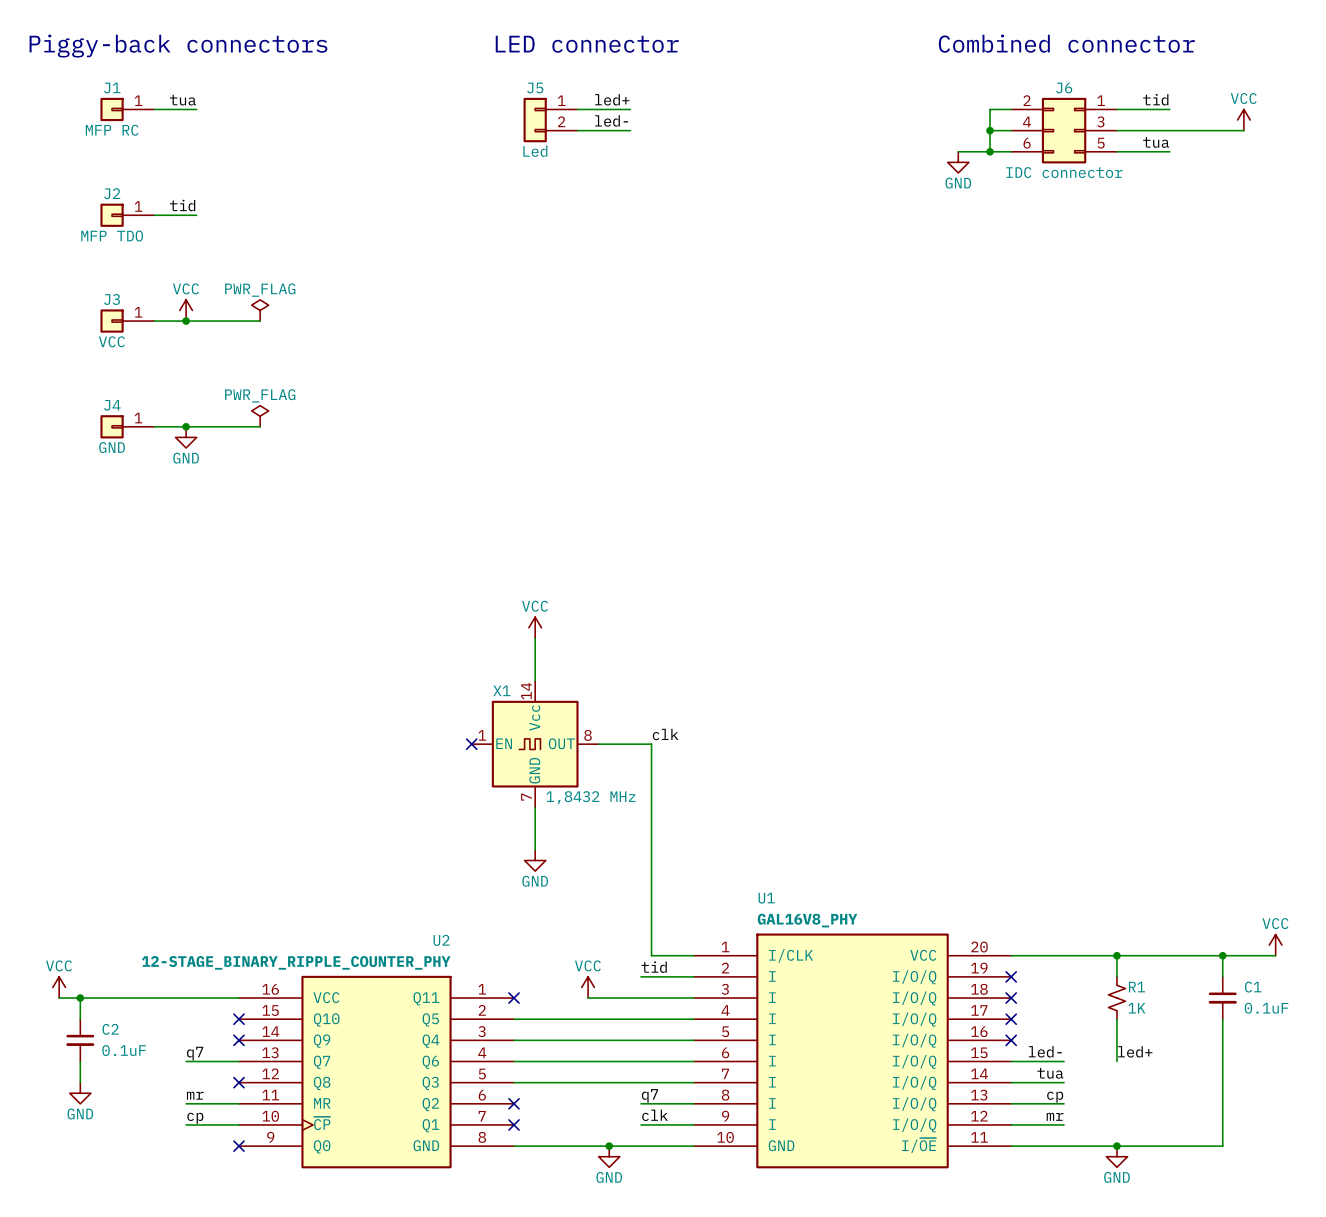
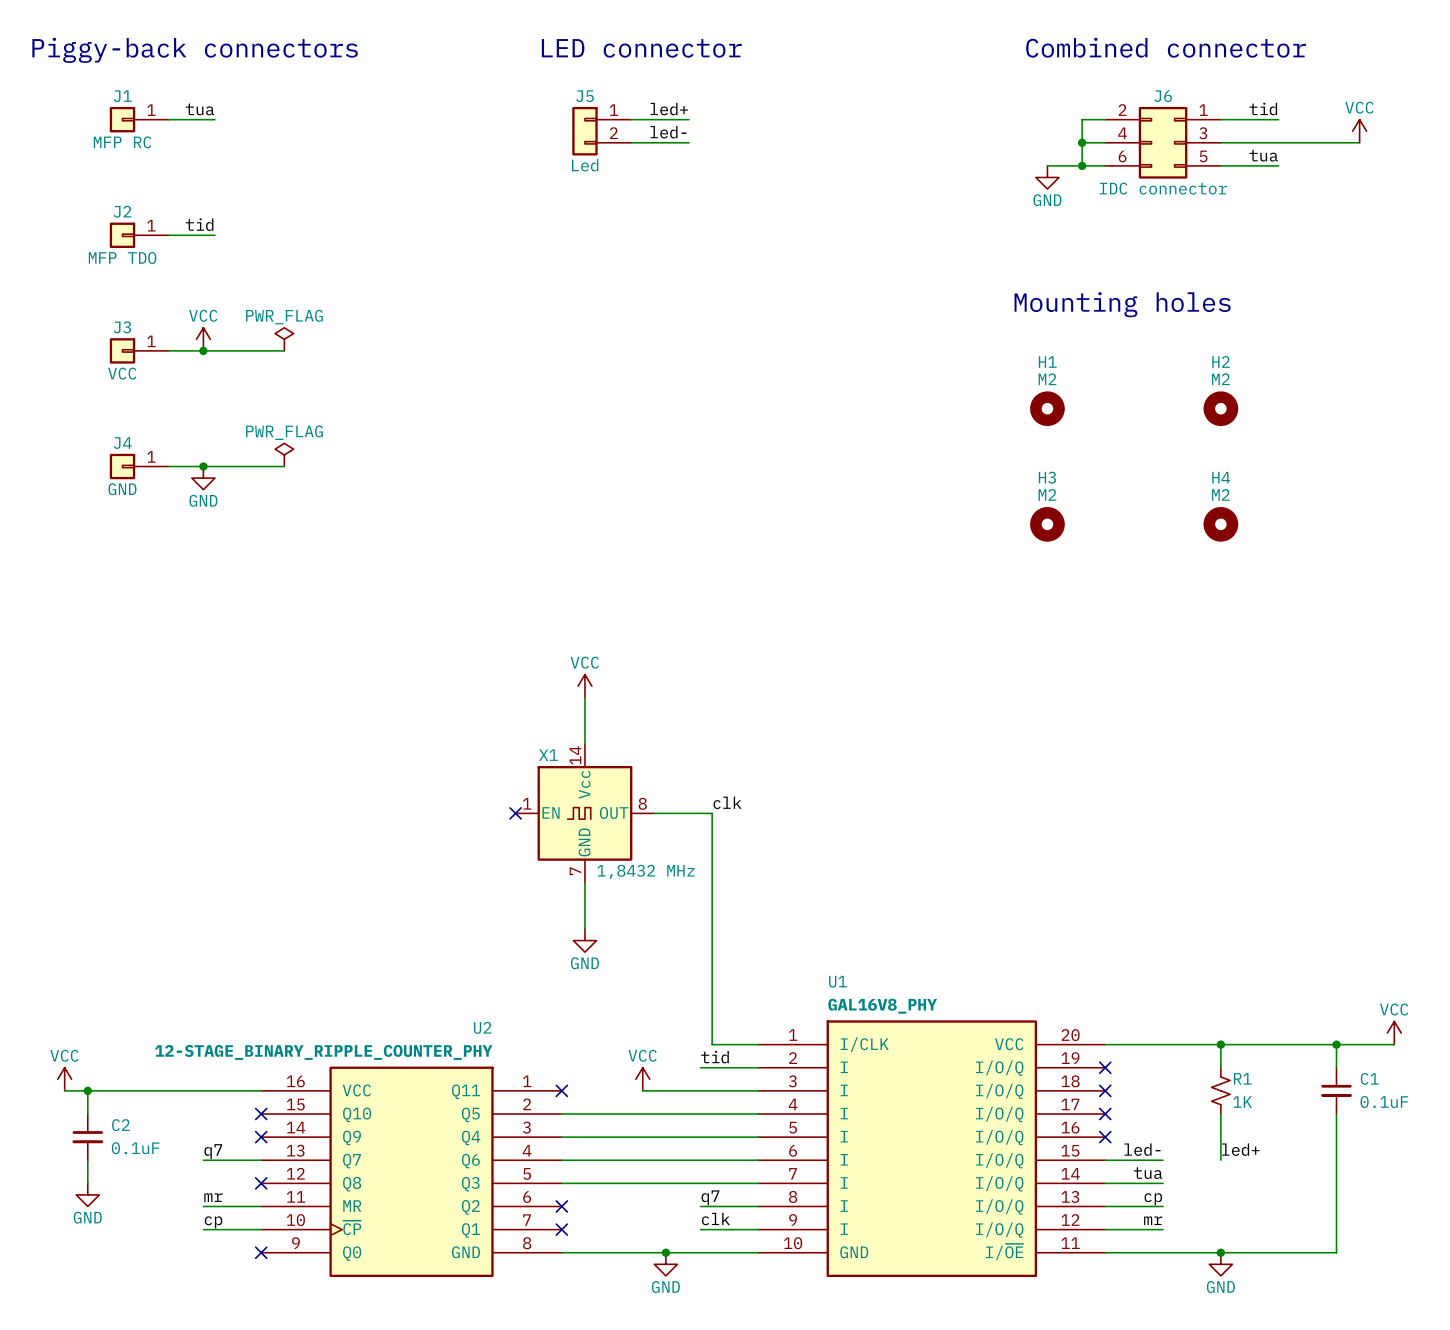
text: none -> Mounting holes (1122, 304)
H1: none -> M2 (1047, 408)
H2: none -> M2 (1220, 408)
H3: none -> M2 (1047, 524)
H4: none -> M2 (1220, 524)

